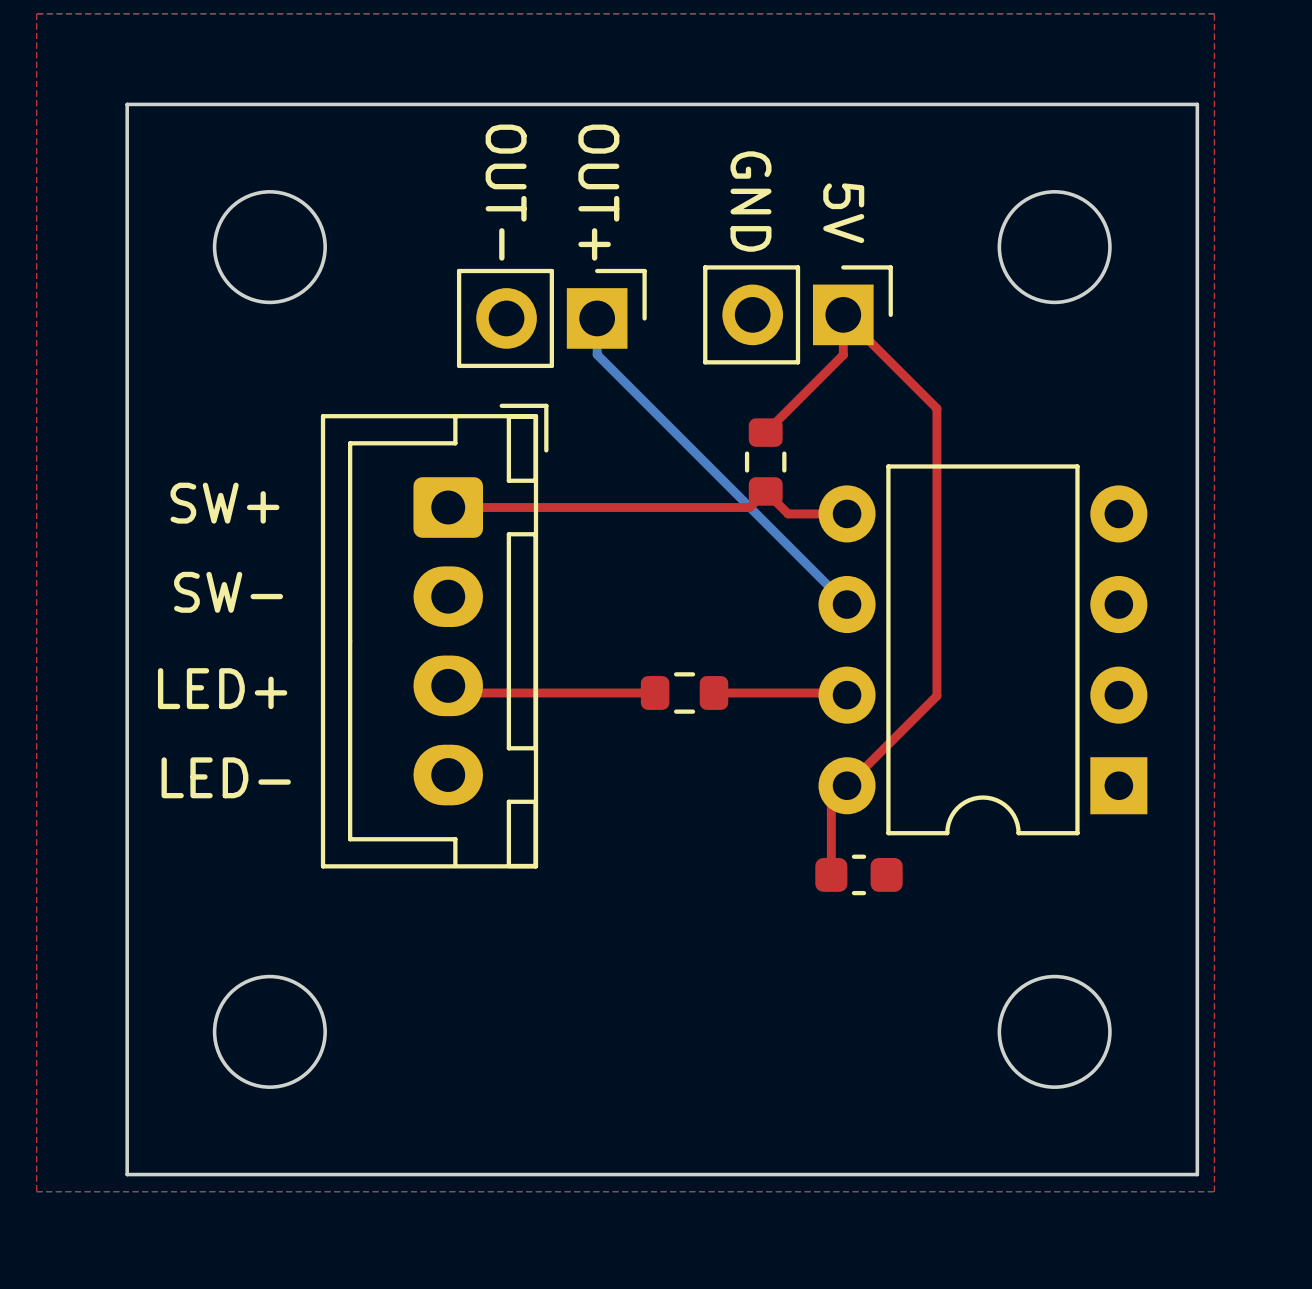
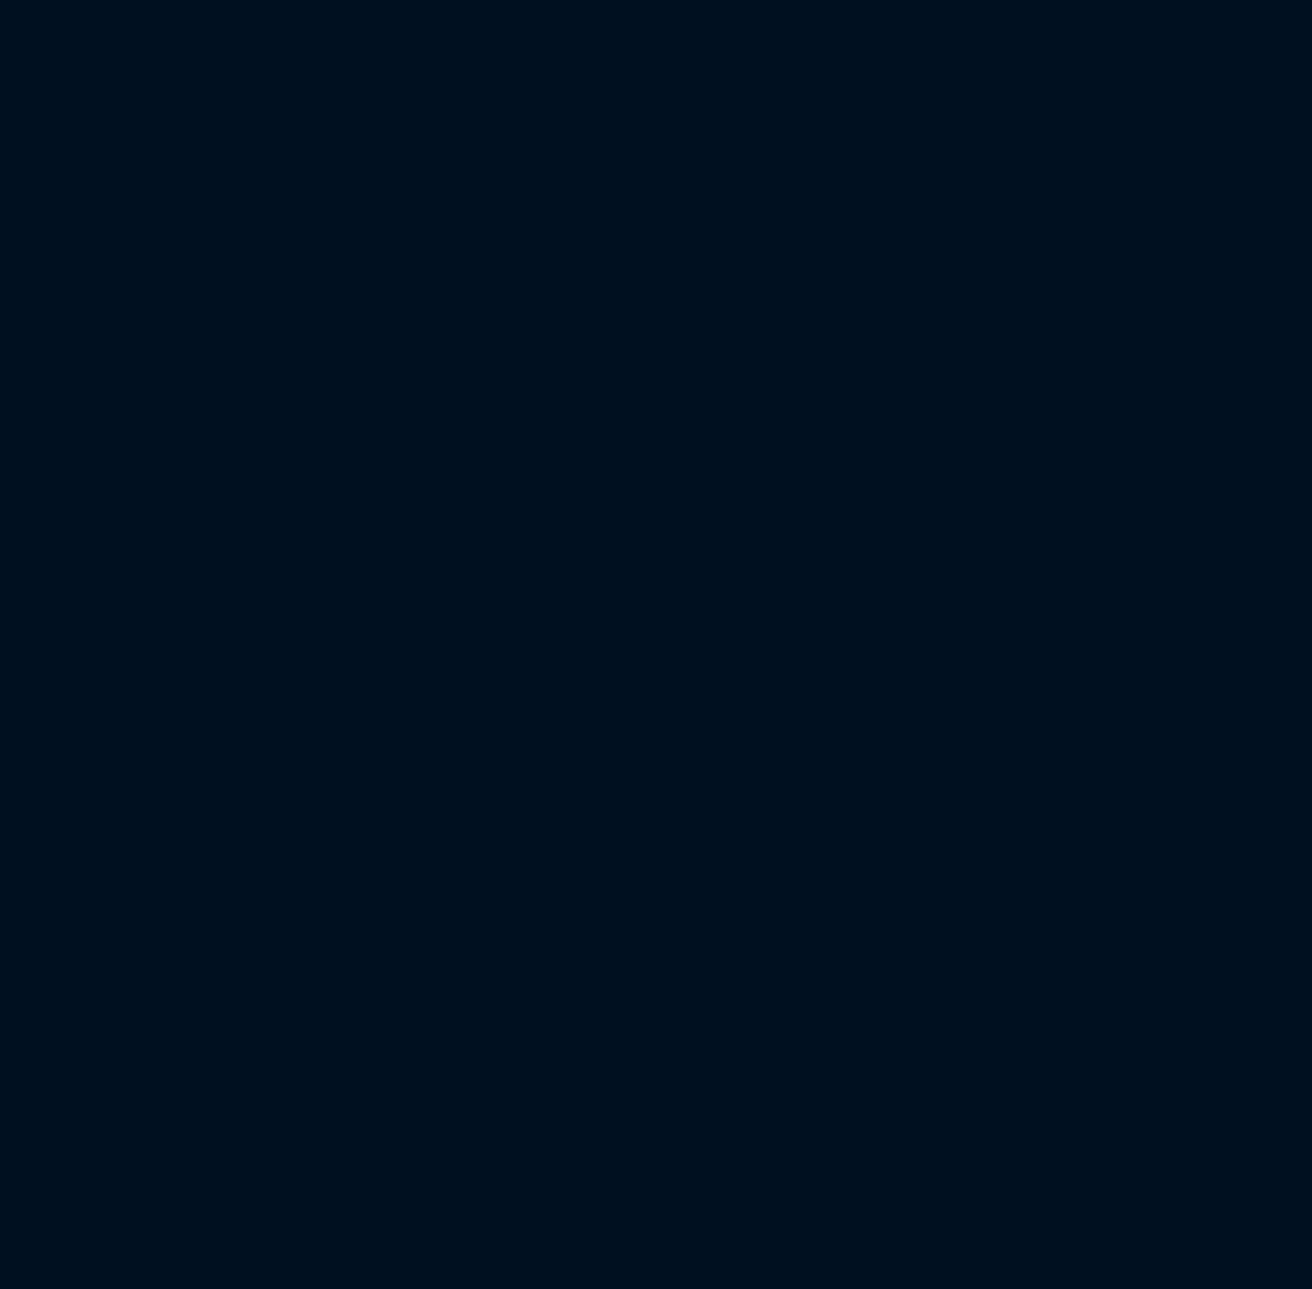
top zone outline: (36, 13) (36, 1191) (1214, 1191) (1214, 13) (36, 13) -> none
board edge: (127, 104) (1197, 104) (1197, 1174) (127, 1174) (127, 104) -> none
round board edge: [212, 190, 327, 305] -> none
round board edge: [997, 190, 1112, 305] -> none
text: OUT- (506, 192) -> none
text: OUT+ (598, 192) -> none
text: GND (750, 201) -> none
text: 5V (843, 213) -> none
part: (797, 314) -> none
part: (551, 318) -> none
bottom track: (597, 318) (597, 354) (847, 604) -> none
top track: (765, 432) (843, 355) (843, 314) (936, 408) (936, 695) (831, 801) (831, 874) -> none
part: (765, 462) -> none
text: SW+ (224, 503) -> none
top track: (448, 507) (749, 507) (765, 491) (788, 513) (847, 513) -> none
text: SW- (228, 592) -> none
part: (434, 636) -> none
part: (982, 649) -> none
top track: (448, 685) (455, 692) (655, 692) -> none
text: LED+ (222, 688) -> none
part: (684, 692) -> none
top track: (713, 692) (844, 692) (847, 695) -> none
text: LED- (226, 777) -> none
part: (858, 874) -> none
round board edge: [212, 974, 327, 1089] -> none
round board edge: [997, 974, 1112, 1089] -> none

